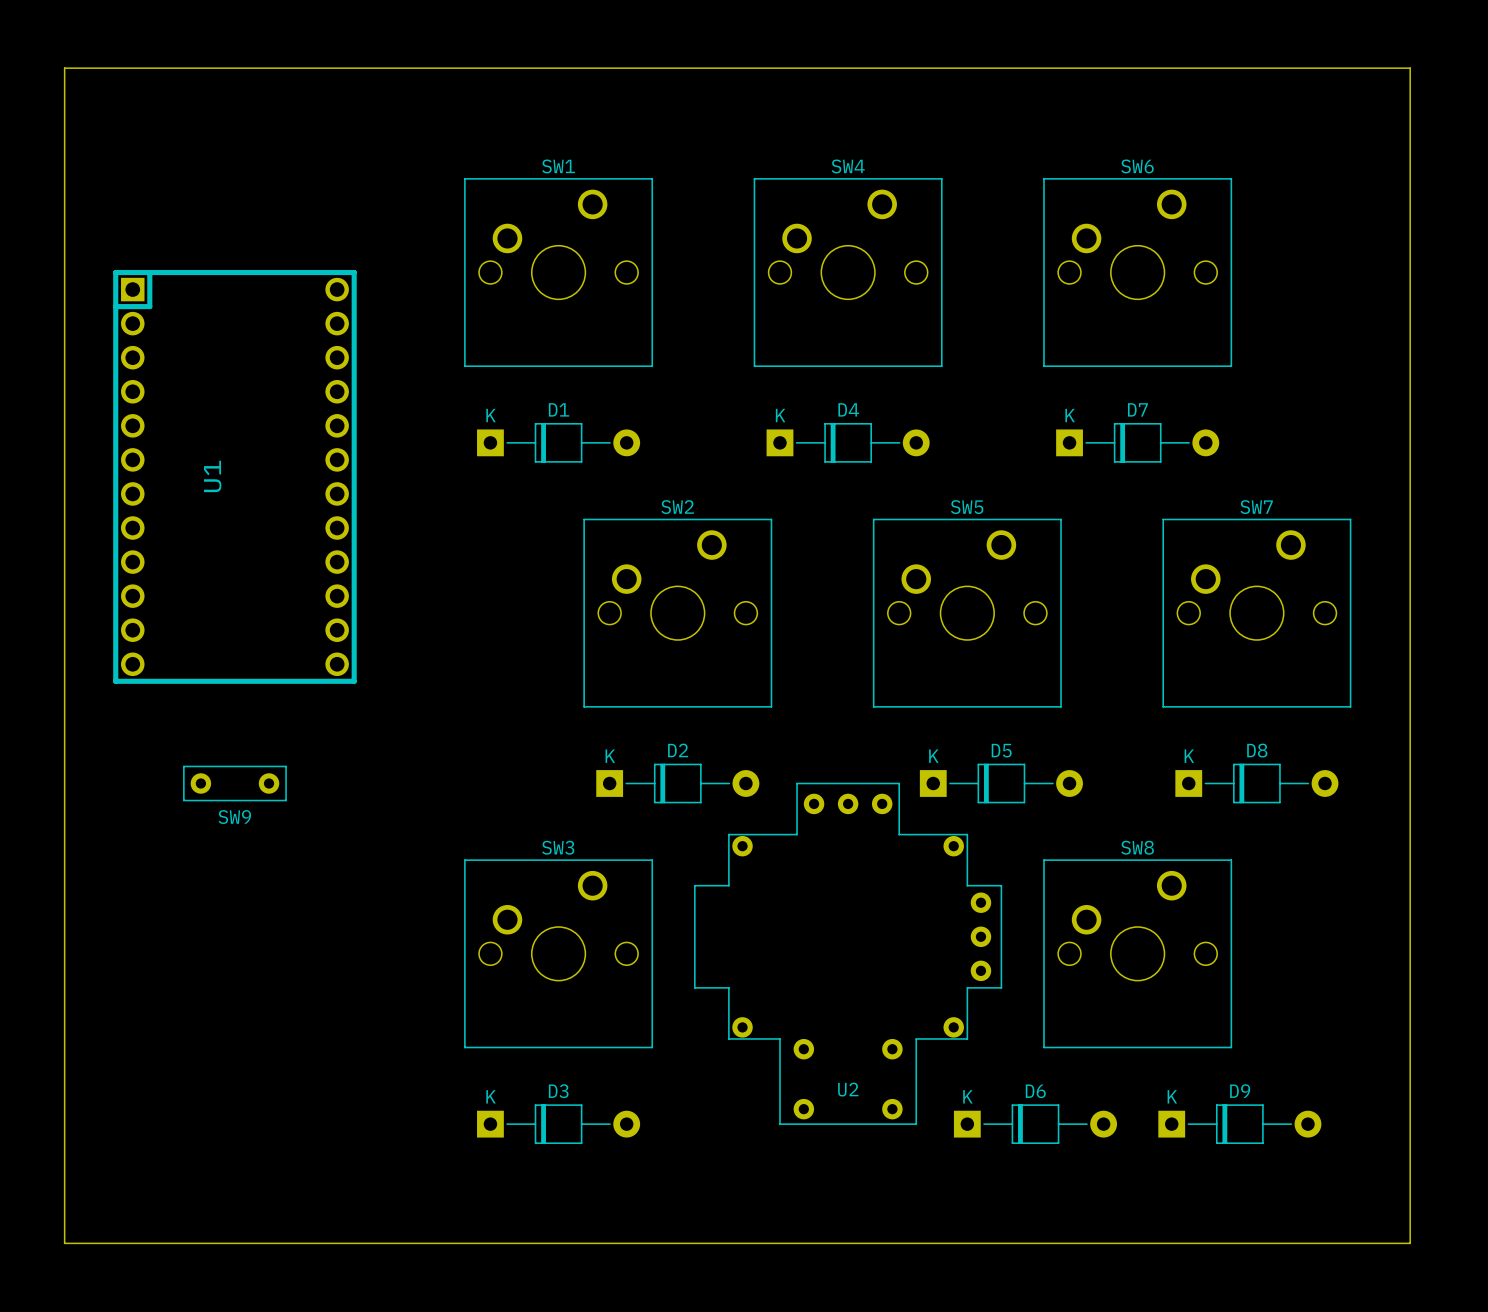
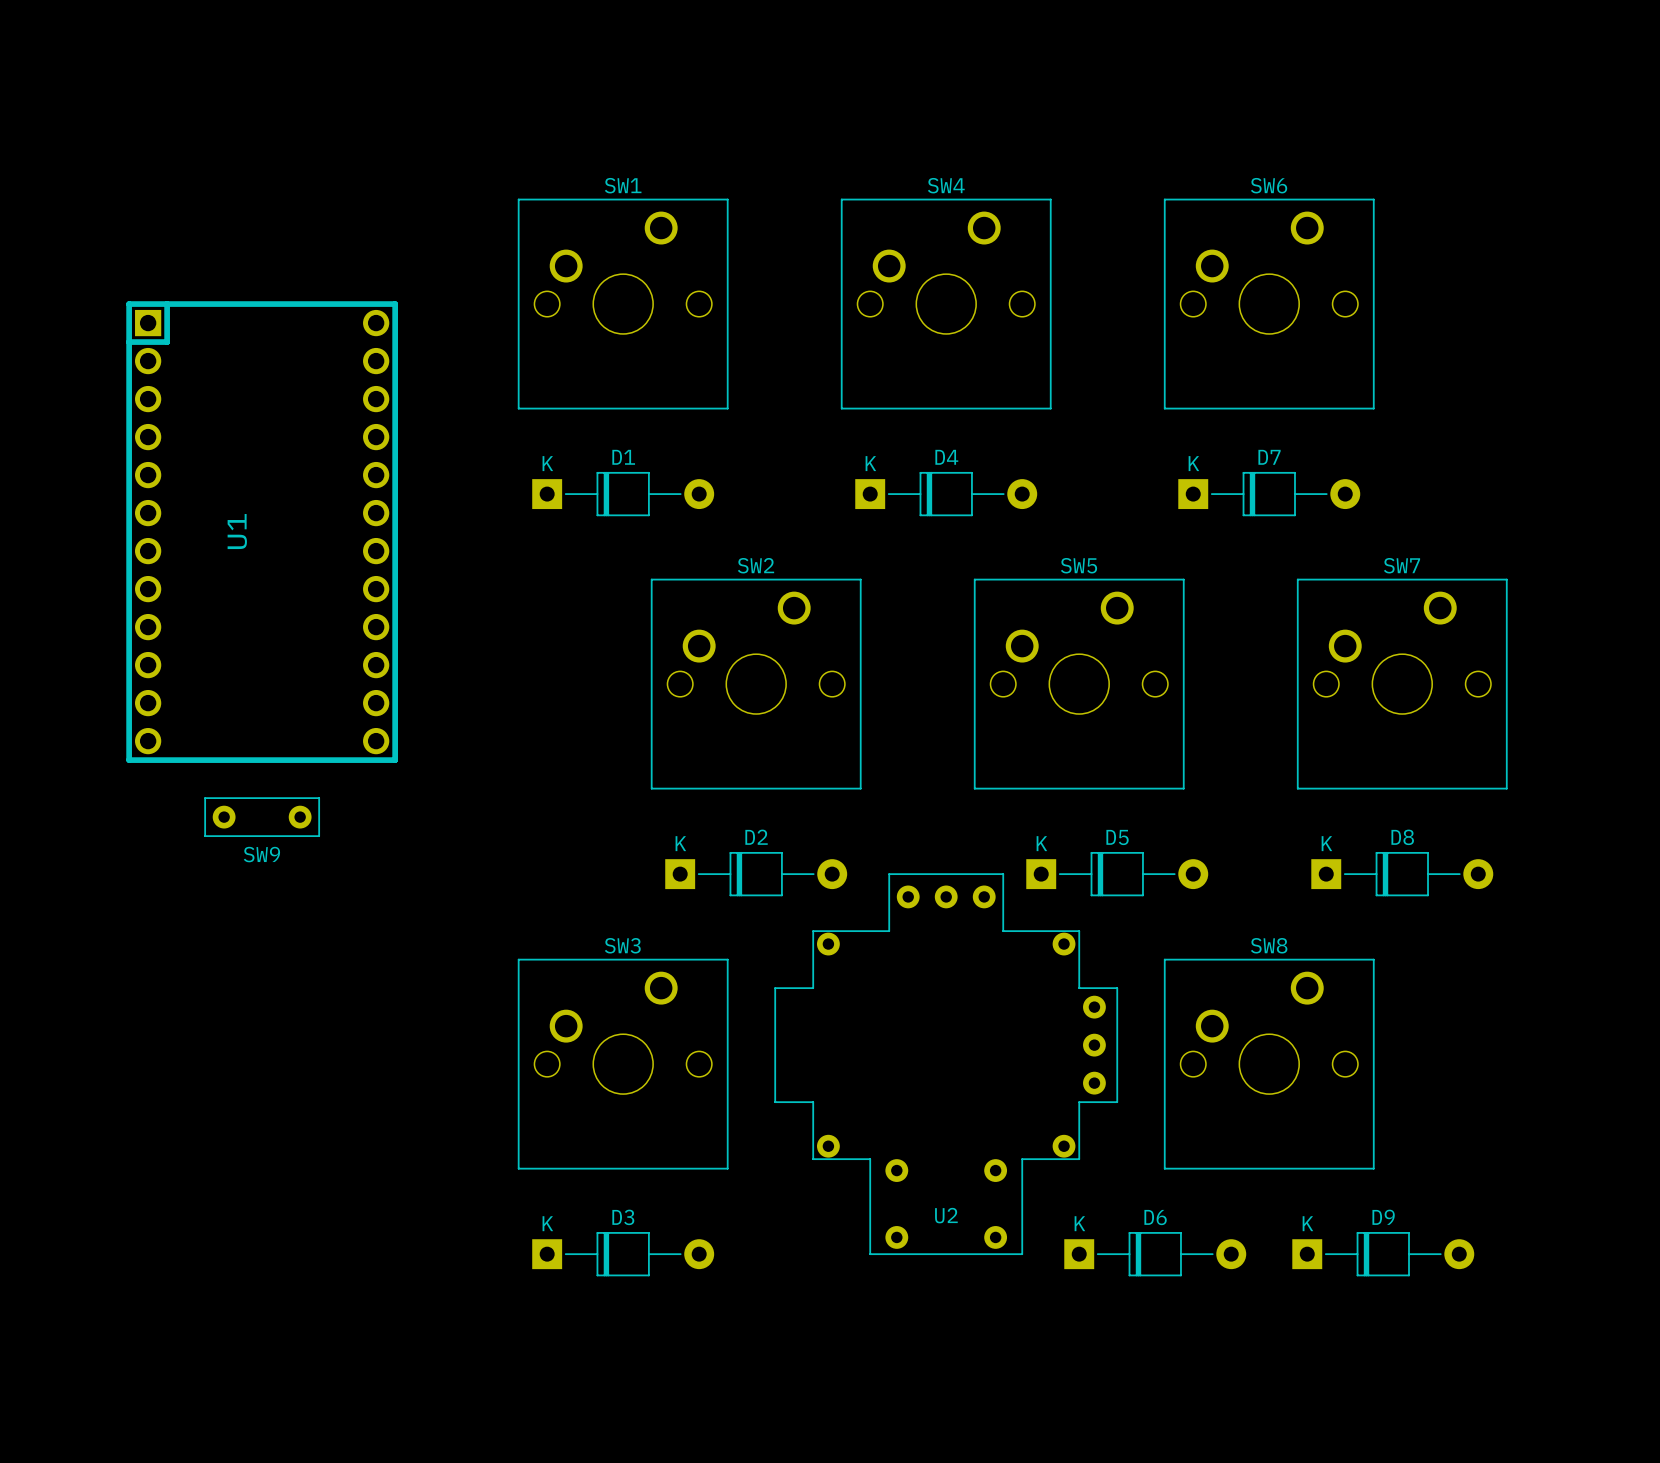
board edge: (64, 68) (64, 1243) (1410, 1243) (1410, 68) (64, 68) -> none
SW9 position: (234, 783) -> (262, 817)

